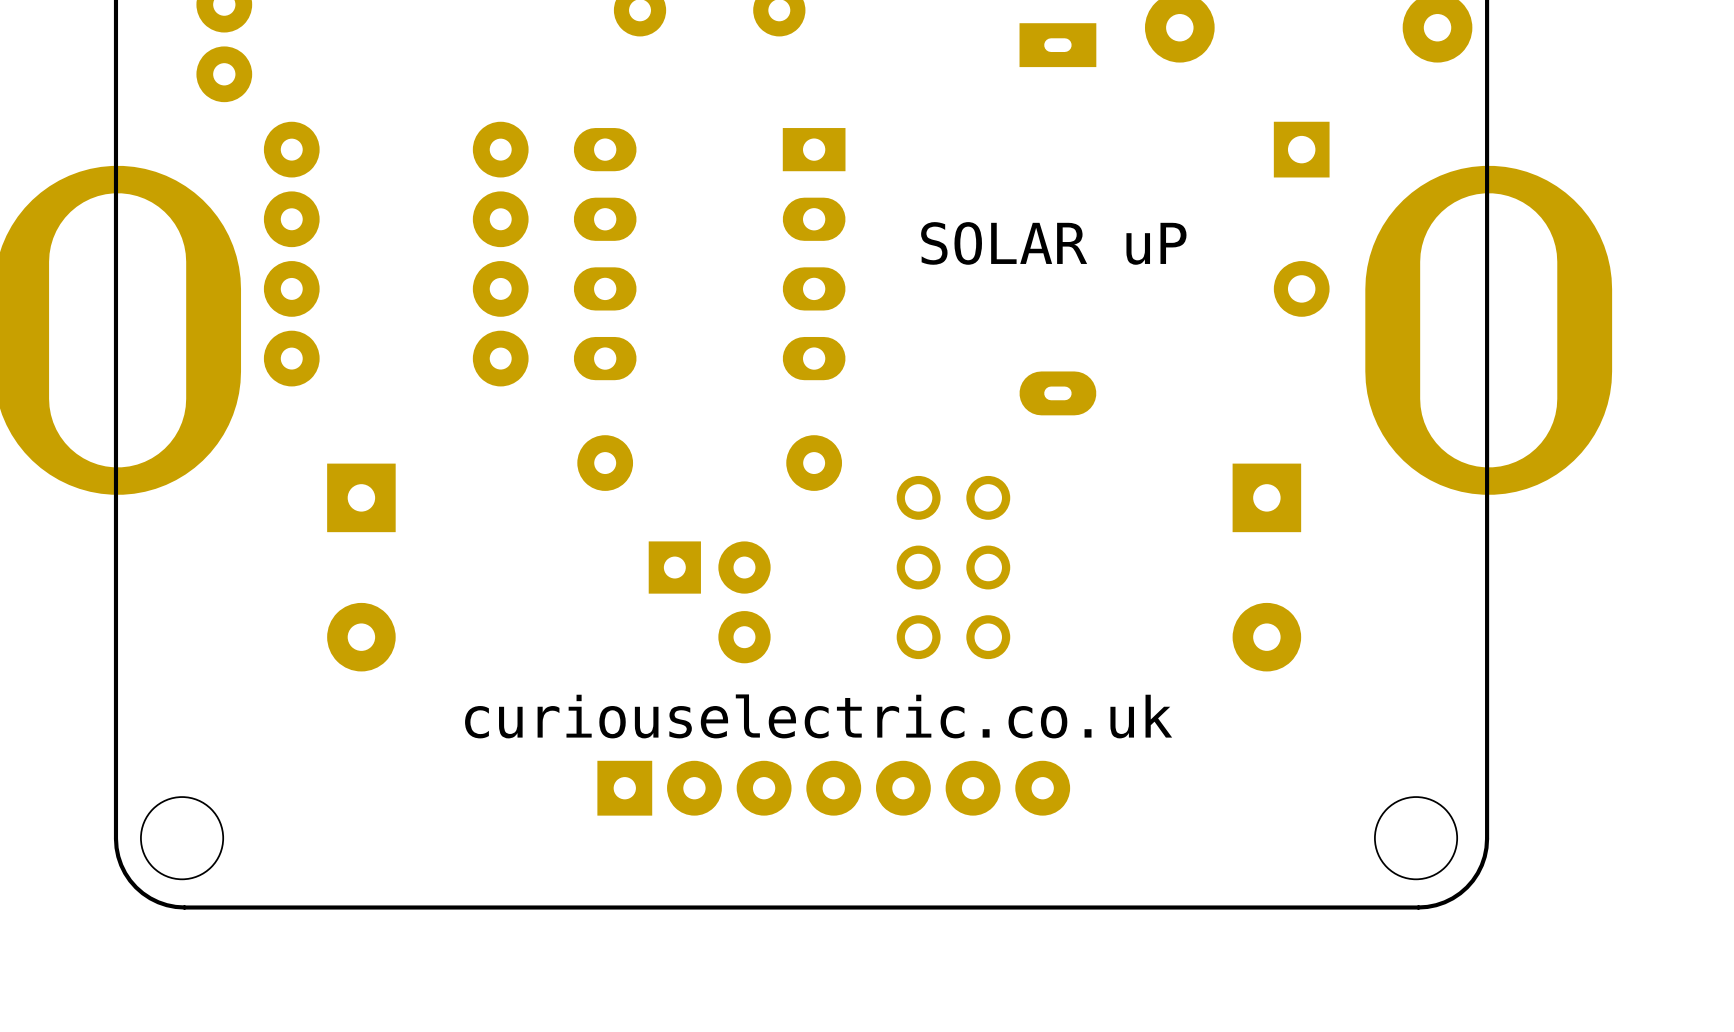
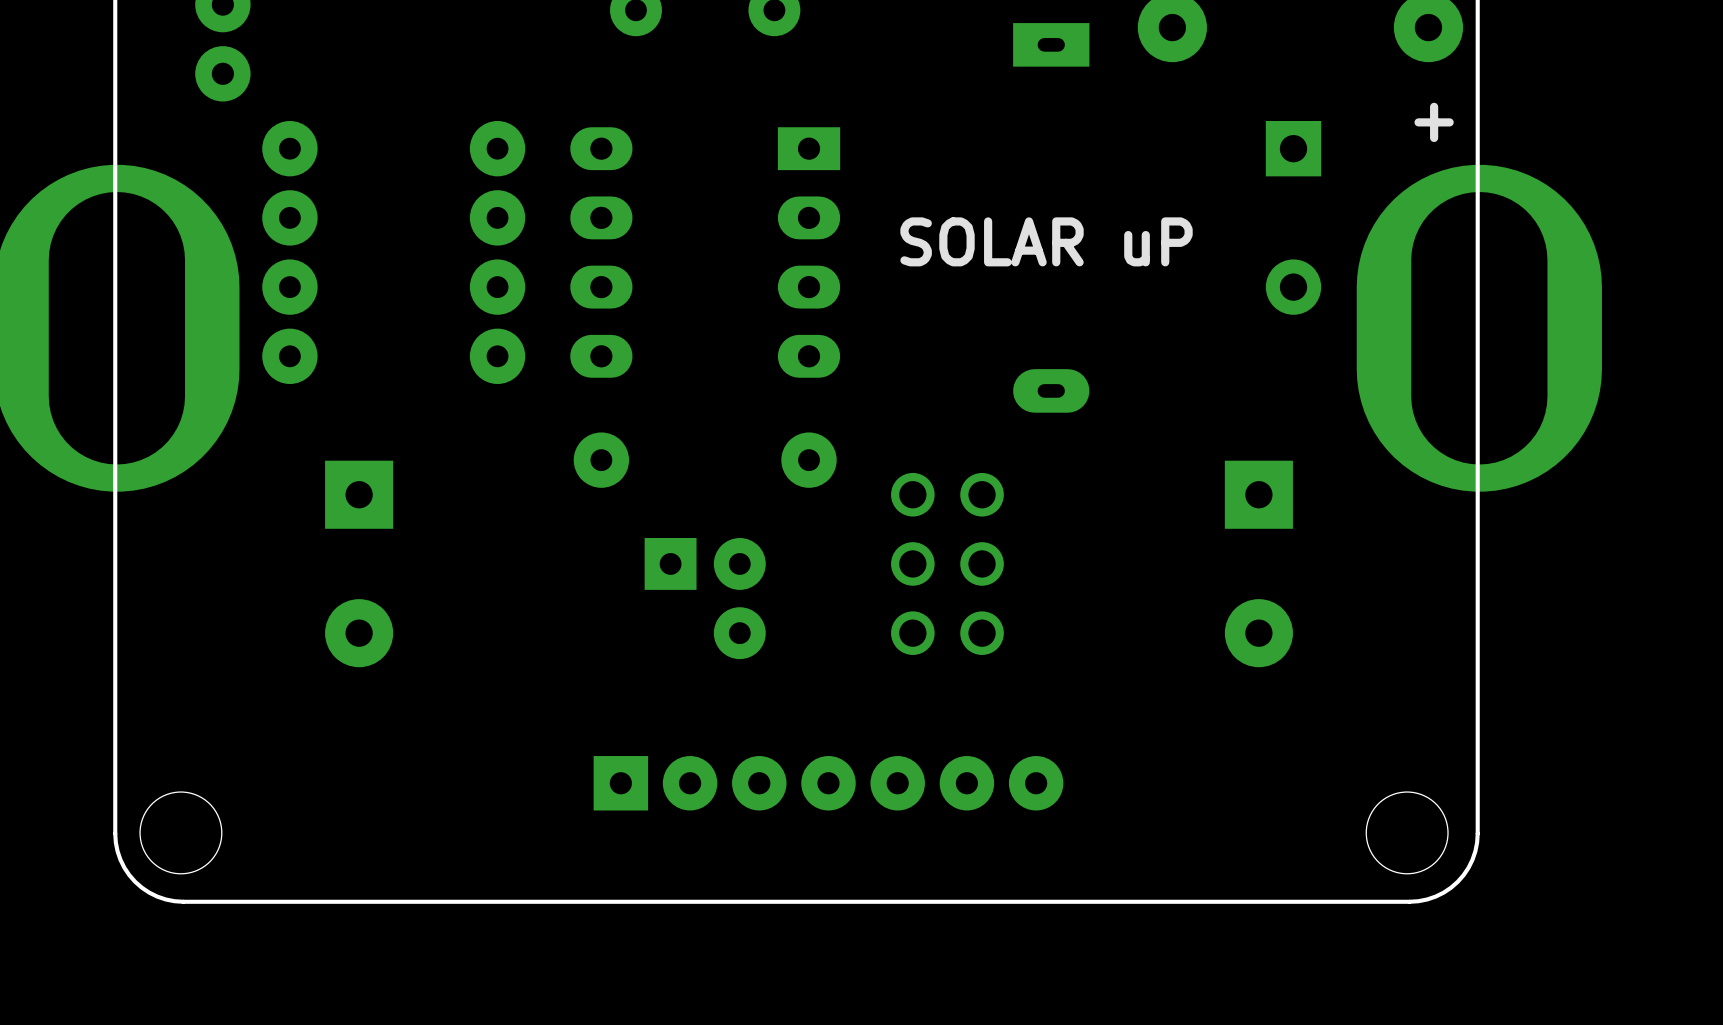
text: none -> + (1434, 122)
text: curiouselectric.co.uk (818, 716) -> none

